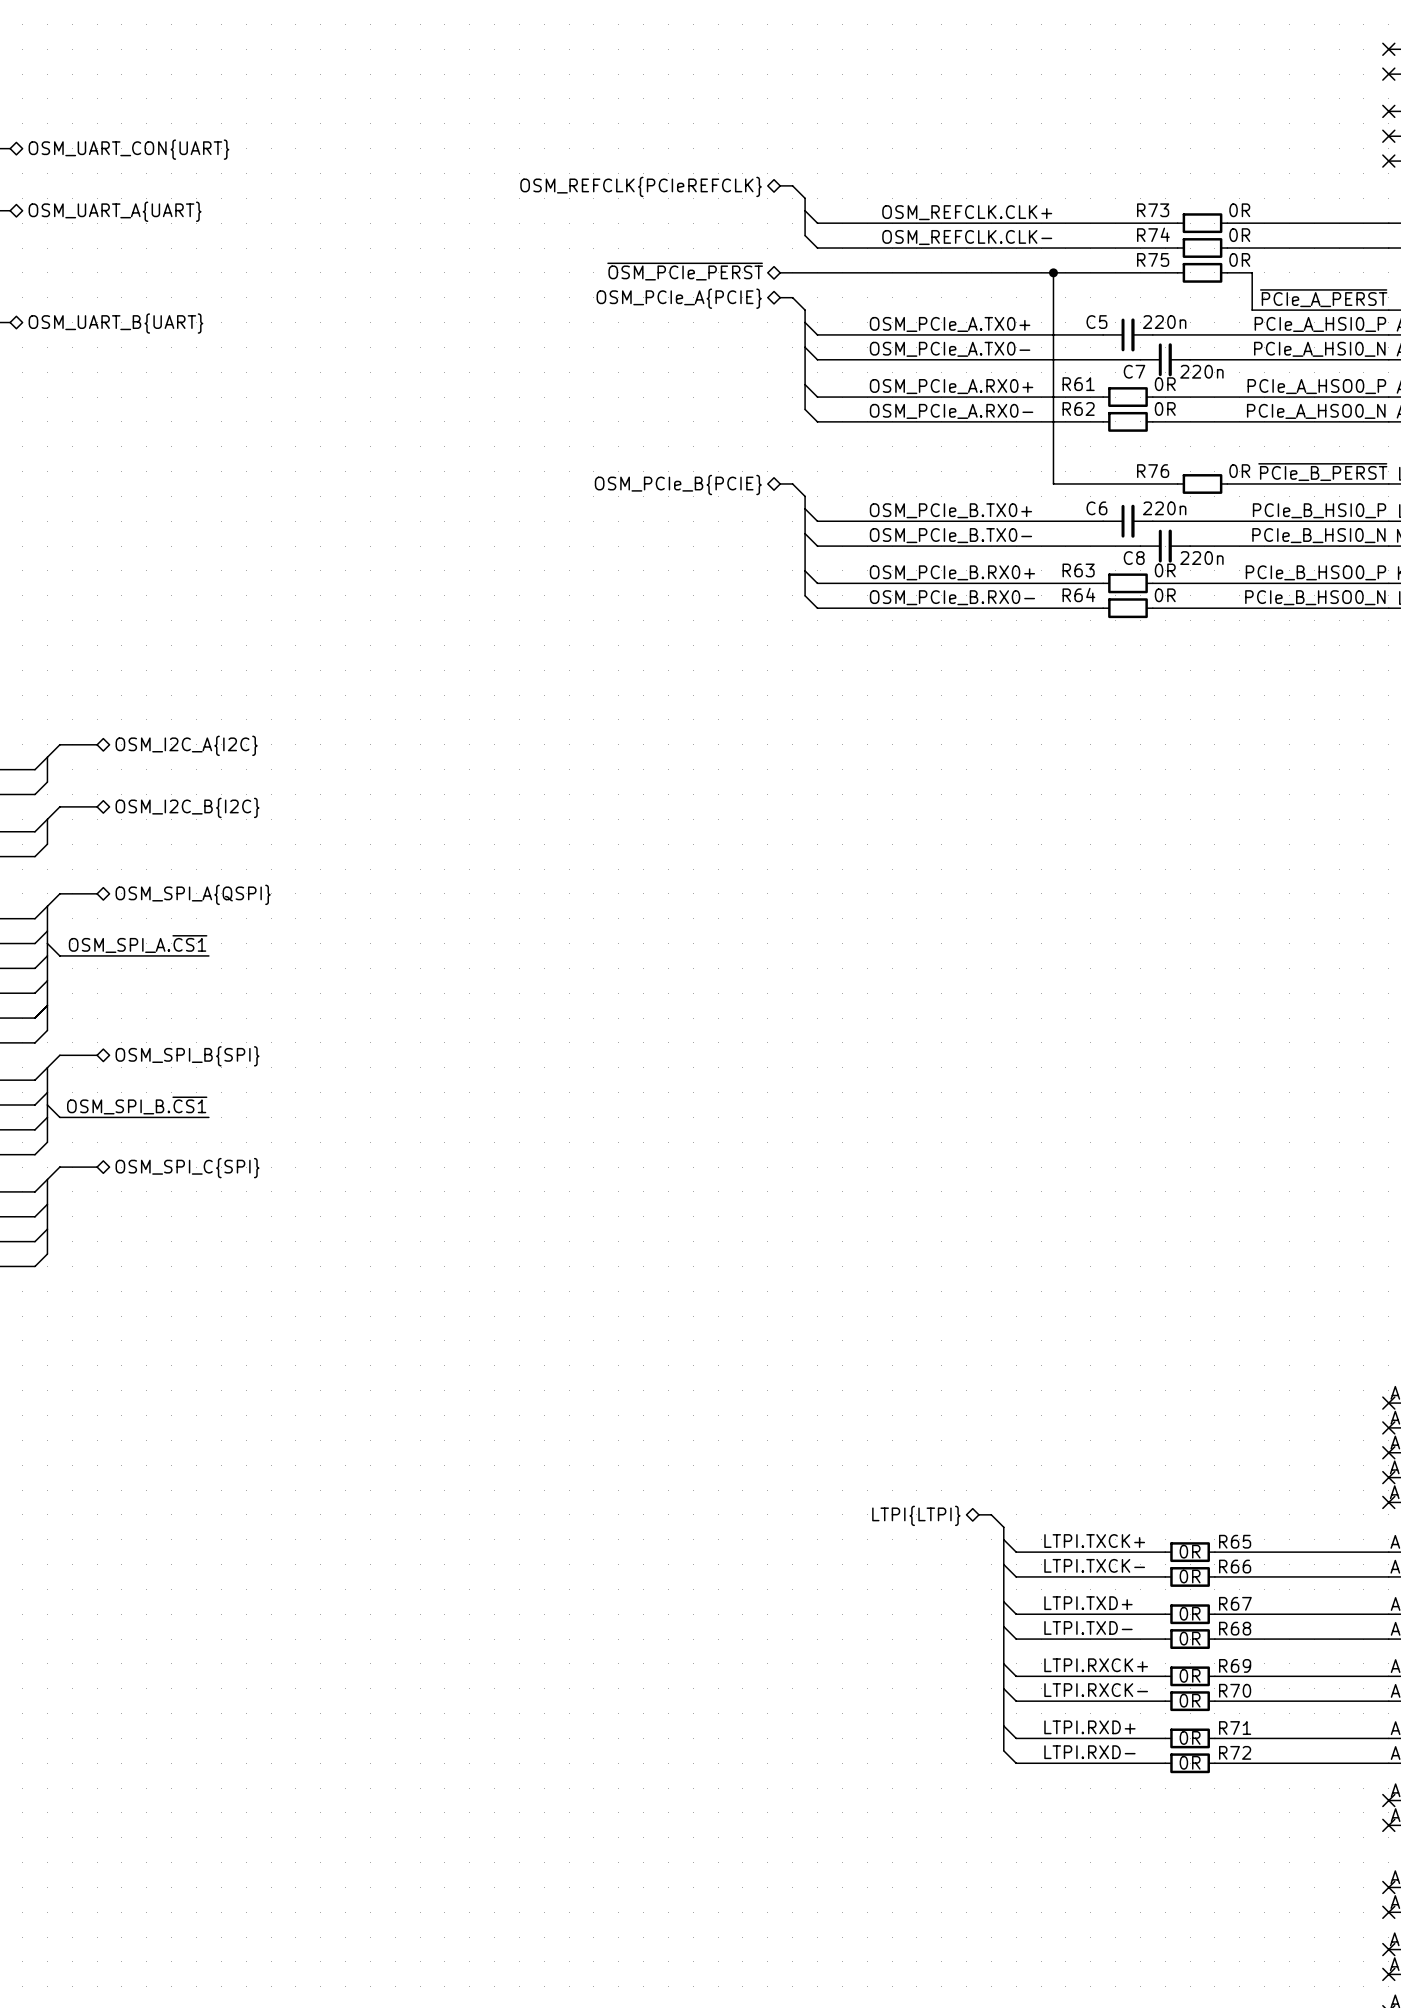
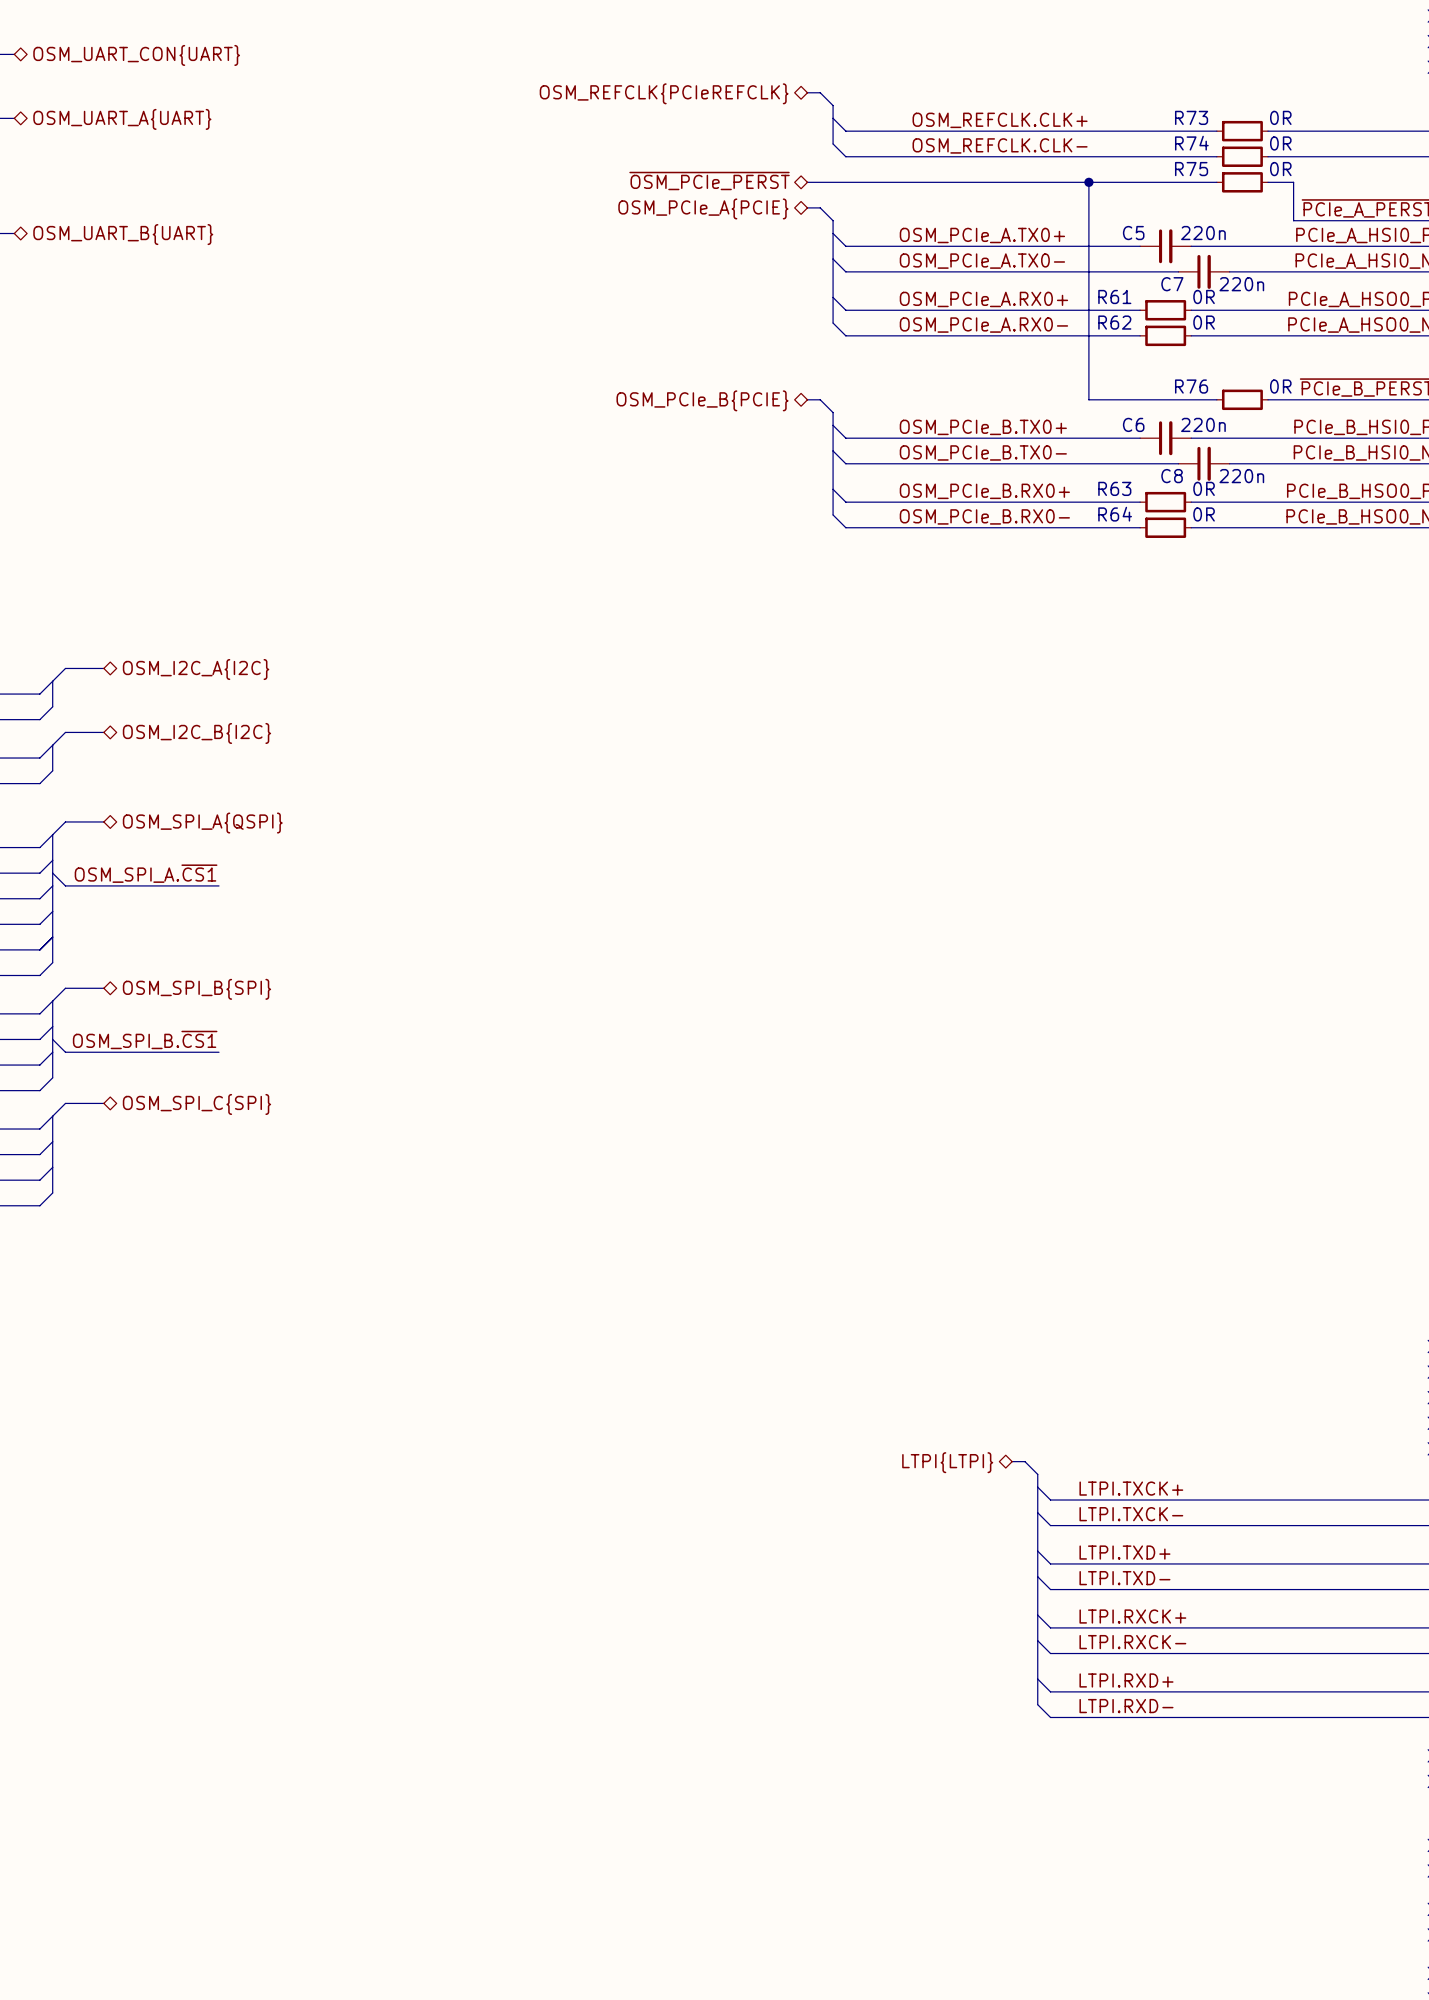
wire: none -> (1204, 1500) (1255, 1500)
R65: (1190, 1552) -> none
wire: none -> (1204, 1525) (1255, 1525)
R66: (1190, 1576) -> none
wire: none -> (1204, 1563) (1255, 1563)
R67: (1190, 1614) -> none
wire: none -> (1204, 1589) (1255, 1589)
R68: (1190, 1639) -> none
wire: none -> (1204, 1627) (1255, 1627)
R69: (1190, 1676) -> none
wire: none -> (1204, 1653) (1255, 1653)
R70: (1190, 1701) -> none
wire: none -> (1204, 1691) (1255, 1691)
R71: (1190, 1738) -> none
wire: none -> (1204, 1717) (1255, 1717)
R72: (1190, 1763) -> none

